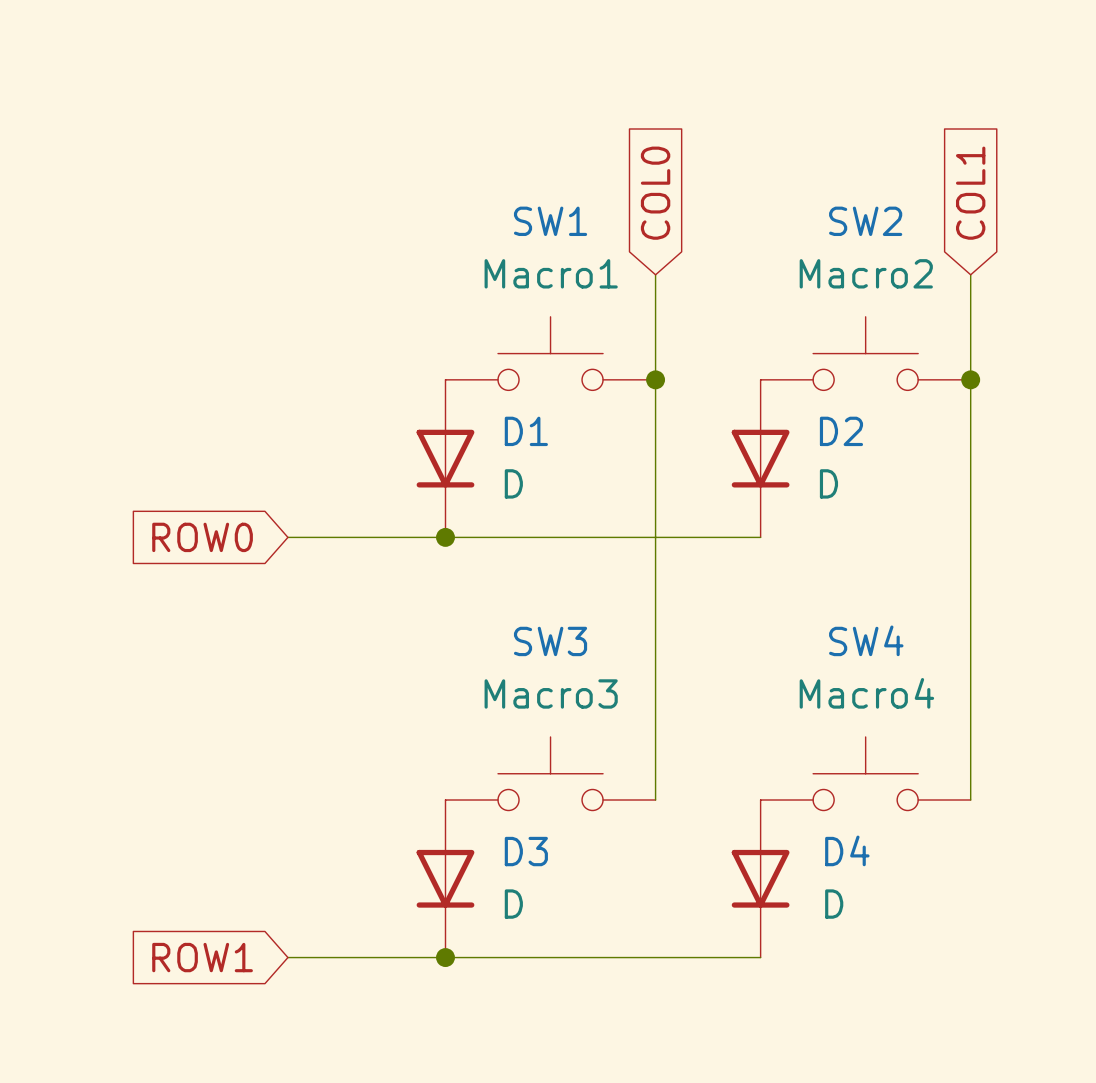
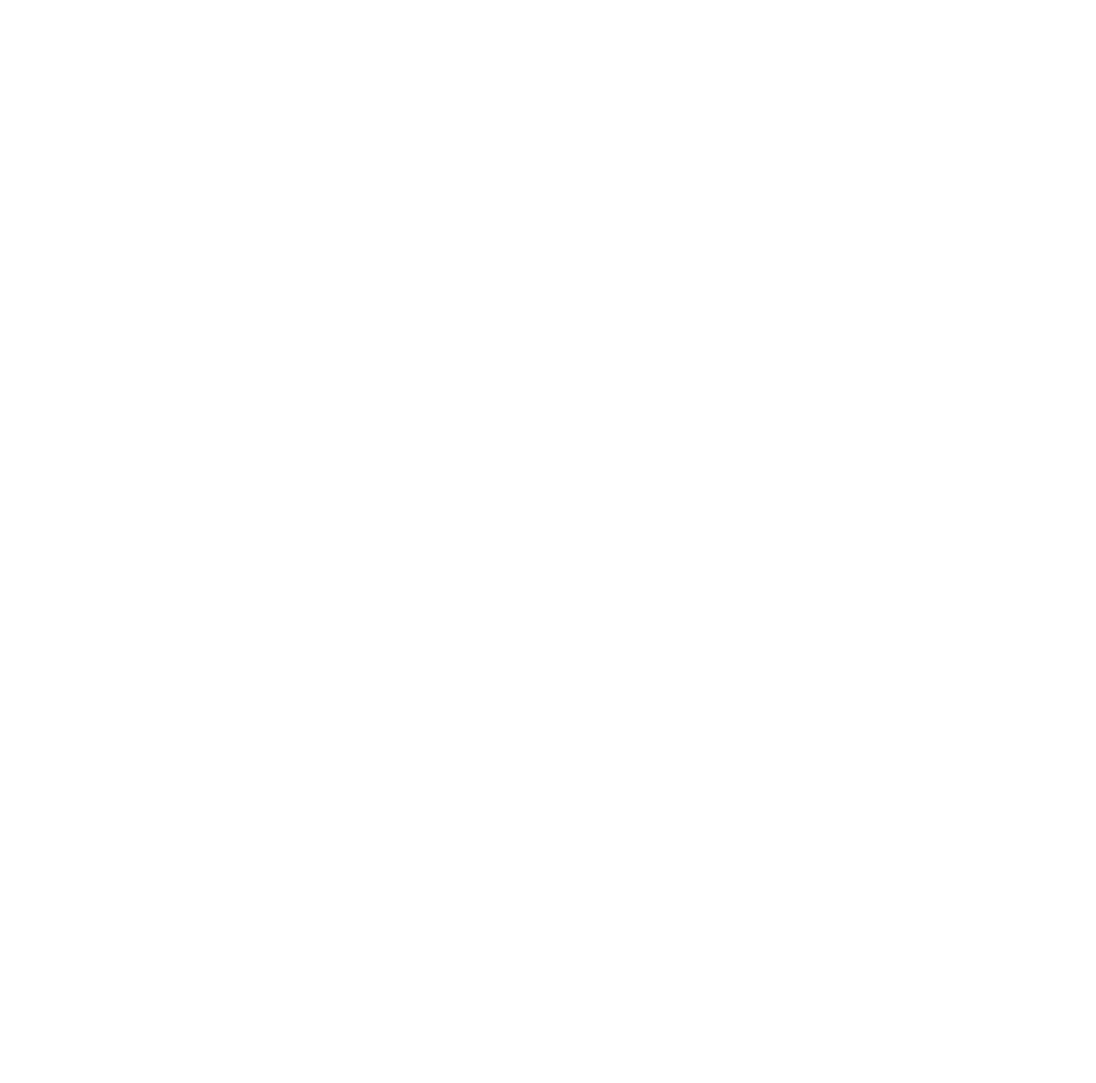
global label: COL0 (655, 193) -> none
global label: COL1 (970, 193) -> none
wire: (655, 274) (655, 800) -> none
wire: (970, 274) (970, 800) -> none
SW1: Macro1 (550, 353) -> none
SW2: Macro2 (865, 353) -> none
junction: (655, 379) -> none
junction: (970, 379) -> none
D1: D (445, 458) -> none
D2: D (760, 458) -> none
global label: ROW0 (202, 537) -> none
wire: (287, 537) (760, 537) -> none
junction: (445, 537) -> none
SW3: Macro3 (550, 773) -> none
SW4: Macro4 (865, 773) -> none
D3: D (445, 878) -> none
D4: D (760, 878) -> none
global label: ROW1 (202, 957) -> none
wire: (287, 957) (760, 957) -> none
junction: (445, 957) -> none

